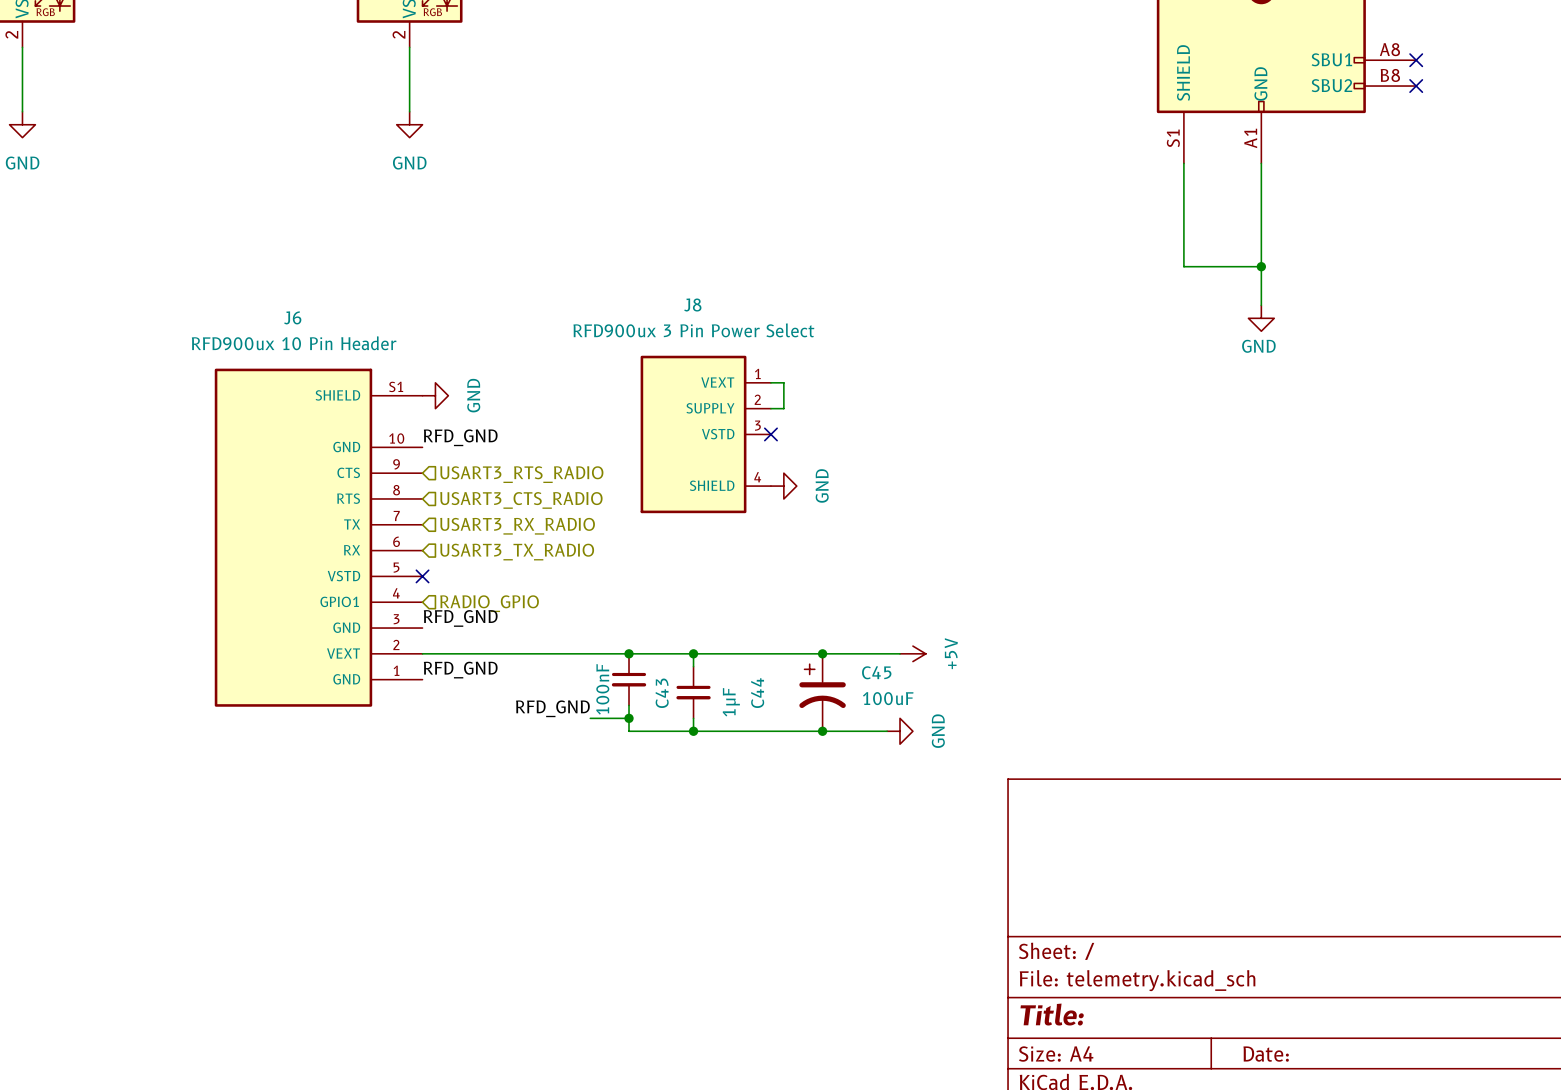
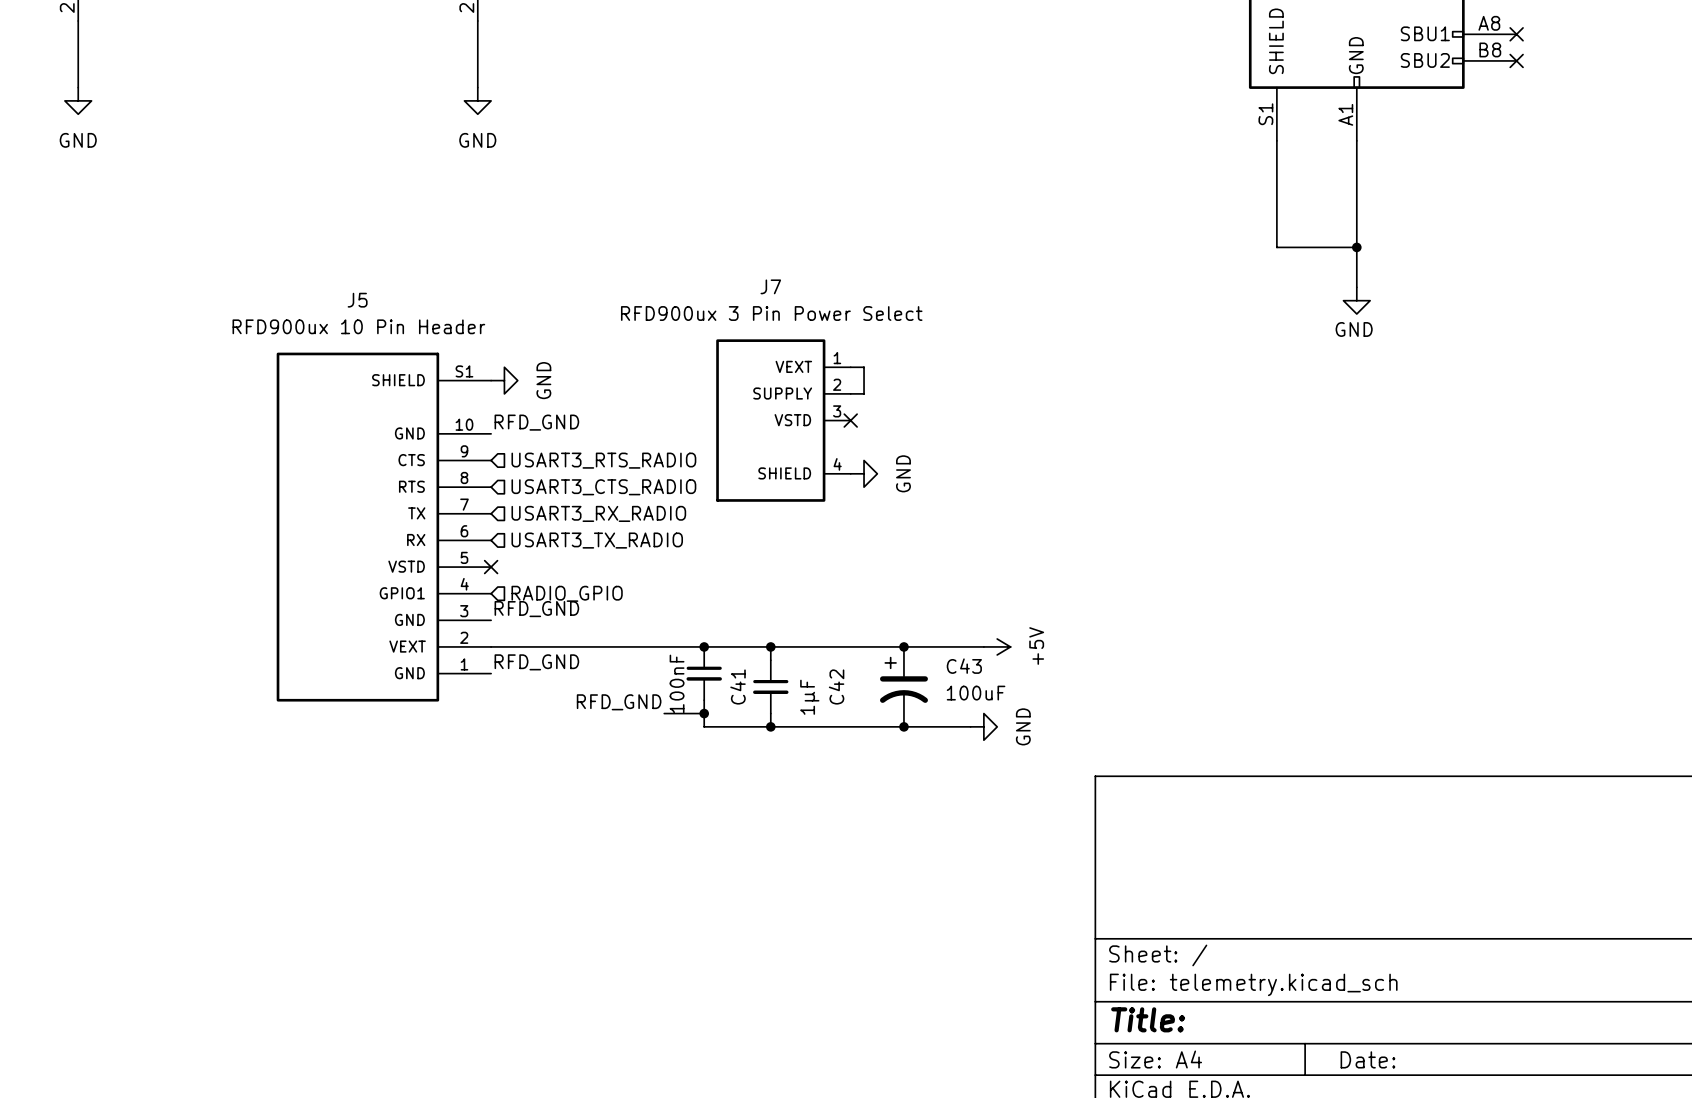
J8 name: J8 (692, 304) -> J7 (770, 286)
J6 name: J6 (292, 317) -> J5 (357, 300)
C45 name: C45 (876, 672) -> C43 (964, 666)
C43 name: C43 (662, 693) -> C41 (738, 686)
C44 name: C44 (757, 693) -> C42 (836, 686)

